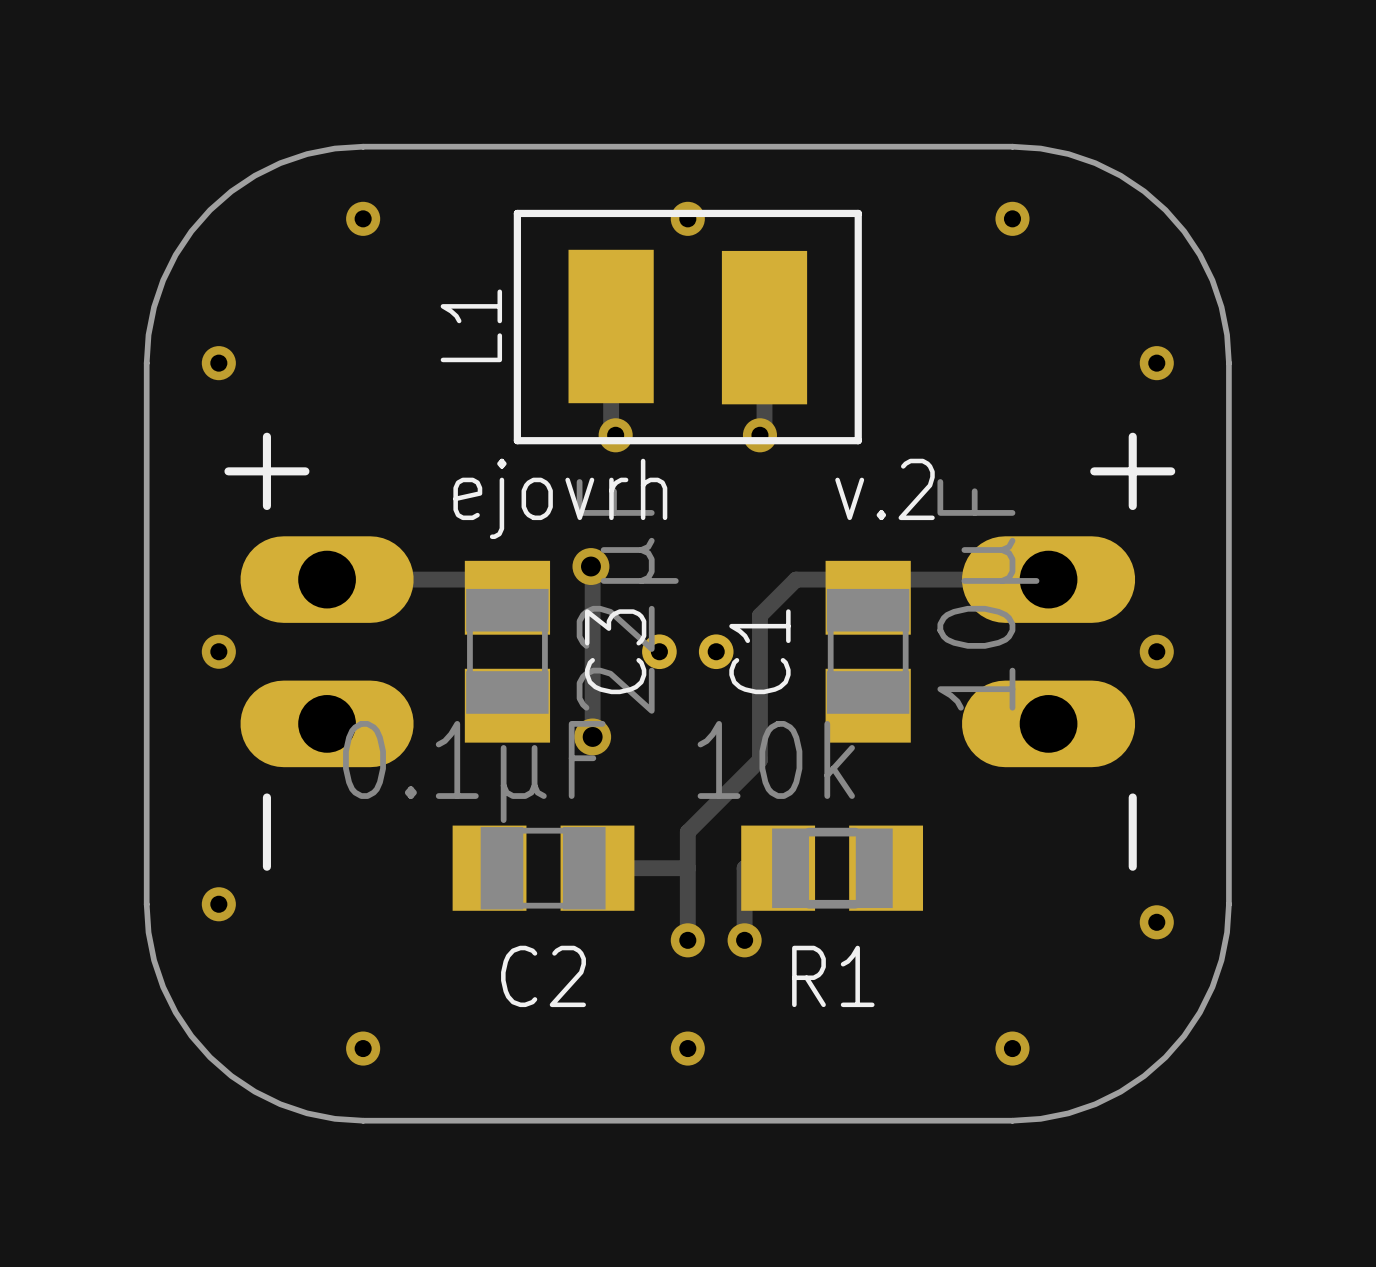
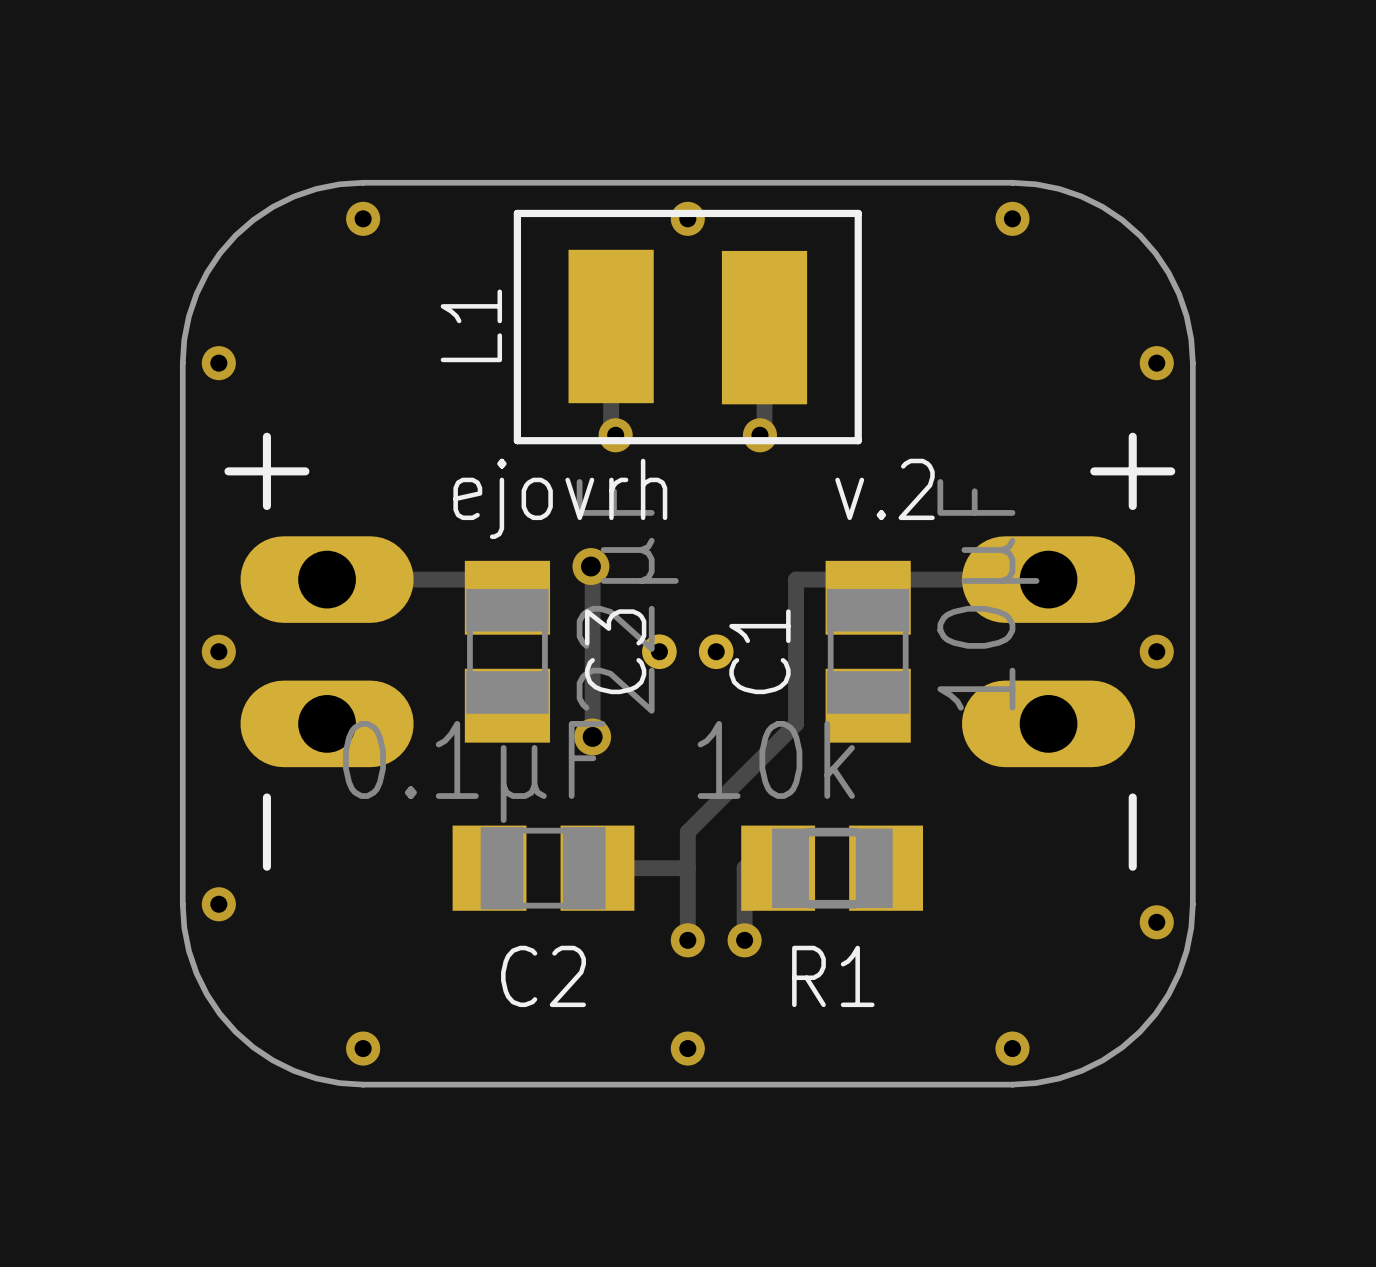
board edge: (1012, 146) (363, 146) (334, 148) (307, 154) (280, 163) (254, 175) (231, 191) (210, 210) (191, 231) (175, 254) (163, 280) (154, 307) (148, 334) (146, 363) (146, 904) (148, 932) (154, 960) (163, 987) (175, 1012) (191, 1036) (210, 1057) (231, 1075) (254, 1091) (280, 1104) (307, 1113) (334, 1118) (363, 1120) (1012, 1120) (1040, 1118) (1068, 1113) (1095, 1104) (1120, 1091) (1144, 1075) (1165, 1057) (1184, 1036) (1199, 1012) (1212, 987) (1221, 960) (1227, 932) (1228, 904) (1228, 363) (1227, 334) (1221, 307) (1212, 280) (1199, 254) (1184, 231) (1165, 210) (1144, 191) (1120, 175) (1095, 163) (1068, 154) (1040, 148) (1012, 146) -> (1012, 182) (1036, 184) (1059, 188) (1081, 196) (1102, 206) (1122, 220) (1140, 235) (1155, 253) (1168, 272) (1179, 294) (1186, 316) (1191, 339) (1192, 363) (1191, 927) (1186, 950) (1179, 973) (1168, 994) (1155, 1014) (1140, 1031) (1122, 1047) (1102, 1060) (1081, 1070) (1059, 1078) (1036, 1083) (1012, 1084) (339, 1083) (316, 1078) (294, 1070) (272, 1060) (253, 1047) (235, 1031) (220, 1014) (206, 994) (196, 973) (188, 950) (184, 927) (182, 904) (184, 339) (188, 316) (196, 294) (206, 272) (220, 253) (235, 235) (253, 220) (272, 206) (294, 196) (316, 188) (339, 184) (1012, 182)
track: (796, 579) (759, 615) (759, 759) -> (796, 579) (796, 723) (759, 759)

